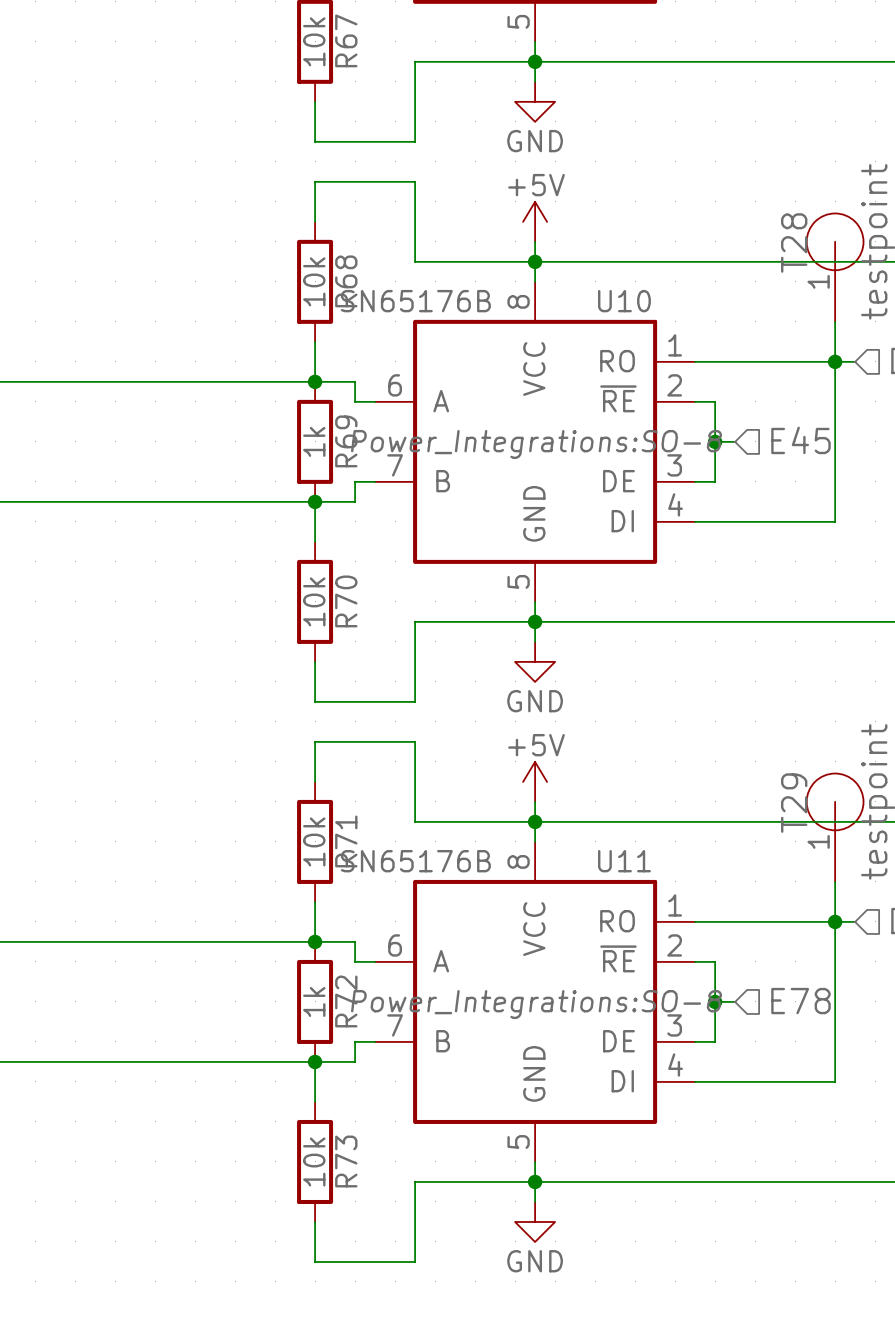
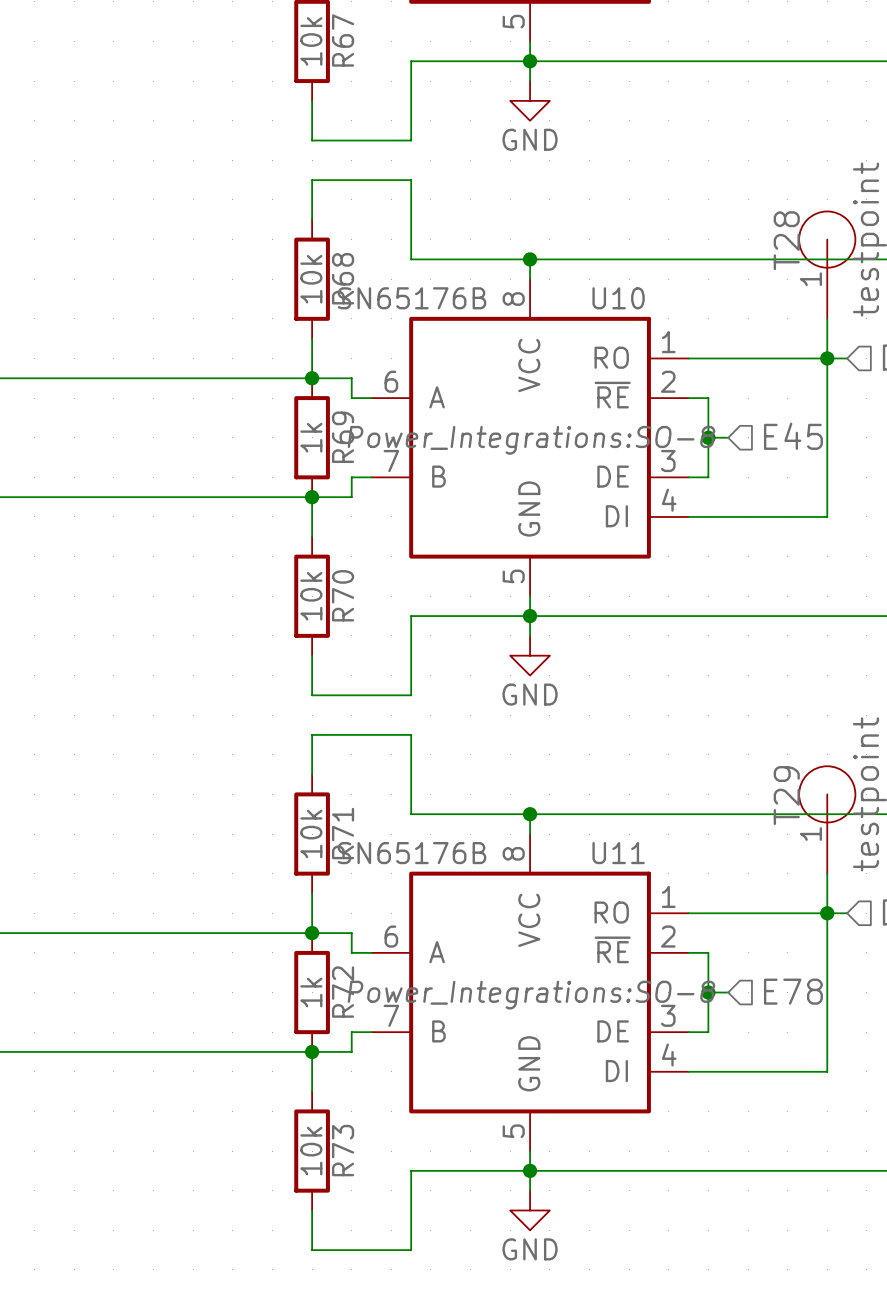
power symbol: +5V (535, 221) -> none
wire: (535, 241) (535, 261) -> none
power symbol: +5V (535, 781) -> none
wire: (535, 801) (535, 821) -> none

